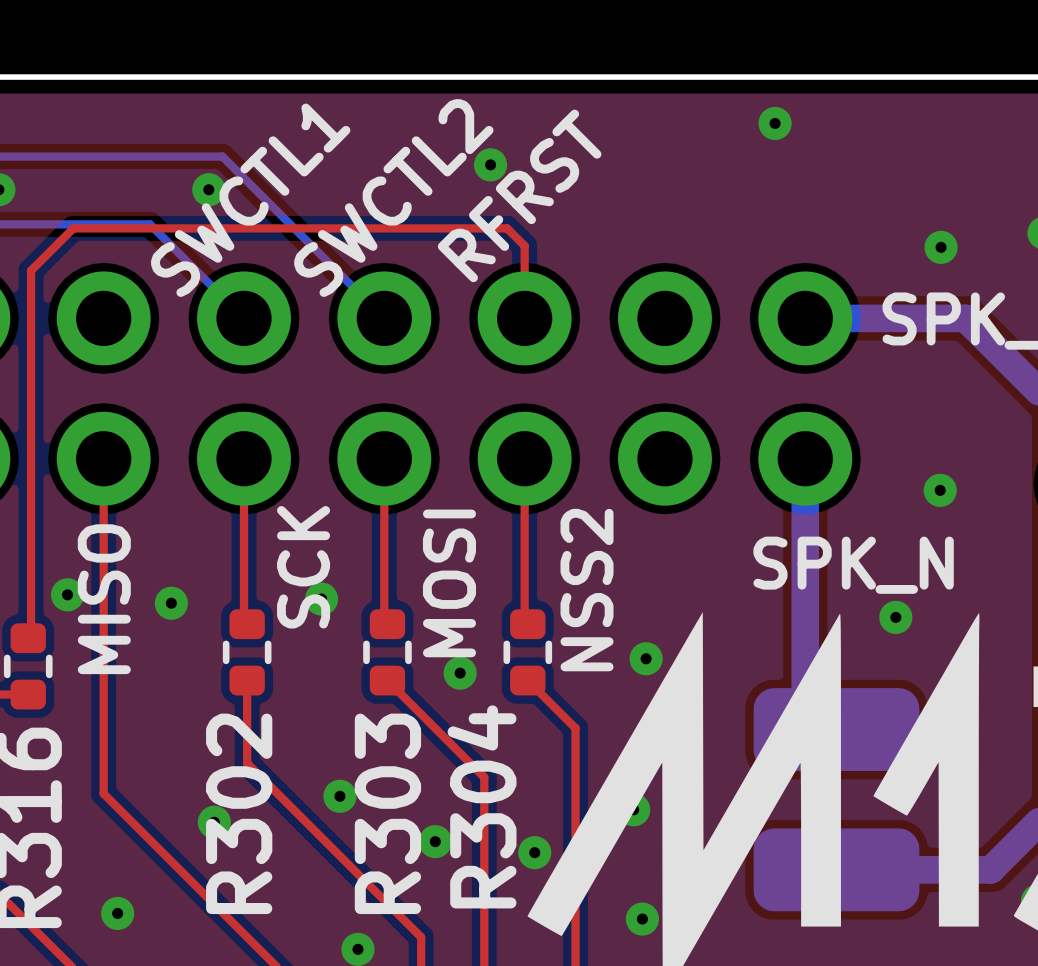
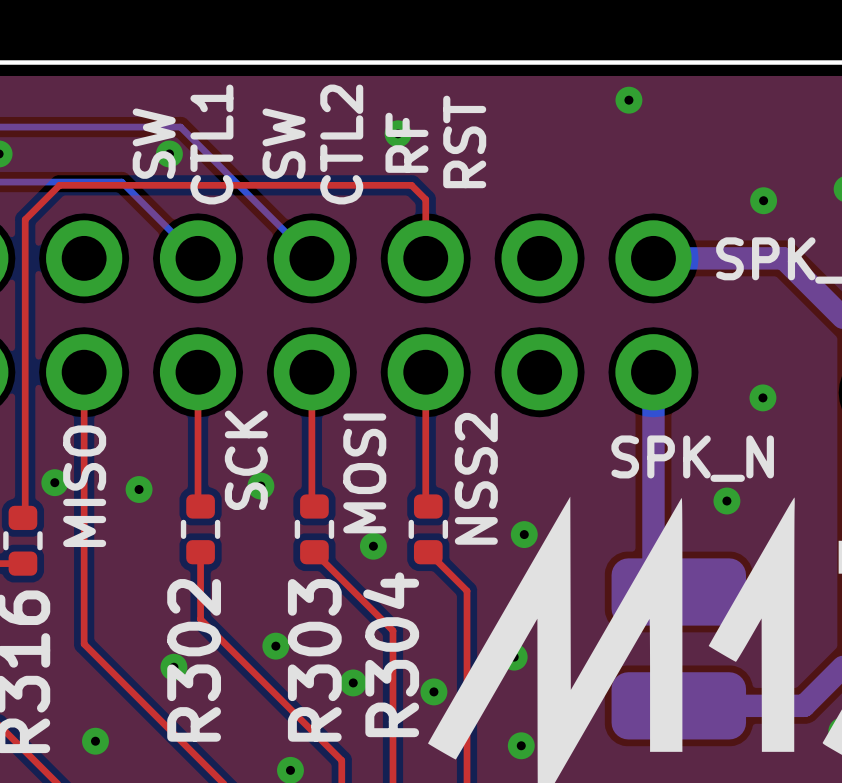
text: none -> RF (406, 142)
text: none -> SW (154, 143)
text: none -> SW (283, 143)
text: RFRST (519, 195) -> RST (464, 141)
text: SWCTL2 (393, 198) -> CTL2 (341, 144)
text: SWCTL1 (250, 200) -> CTL1 (211, 144)

